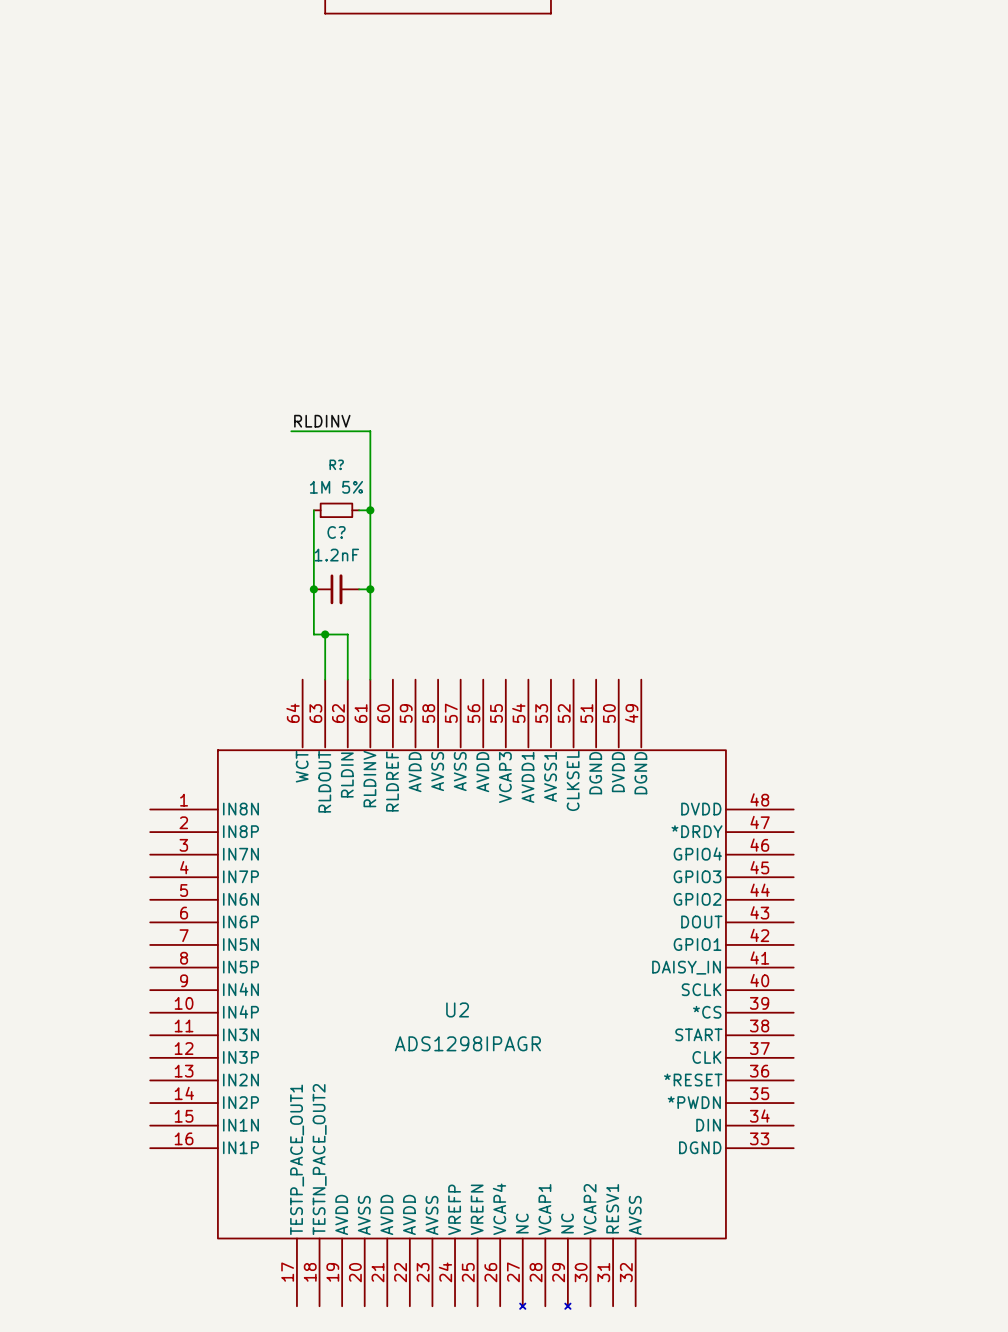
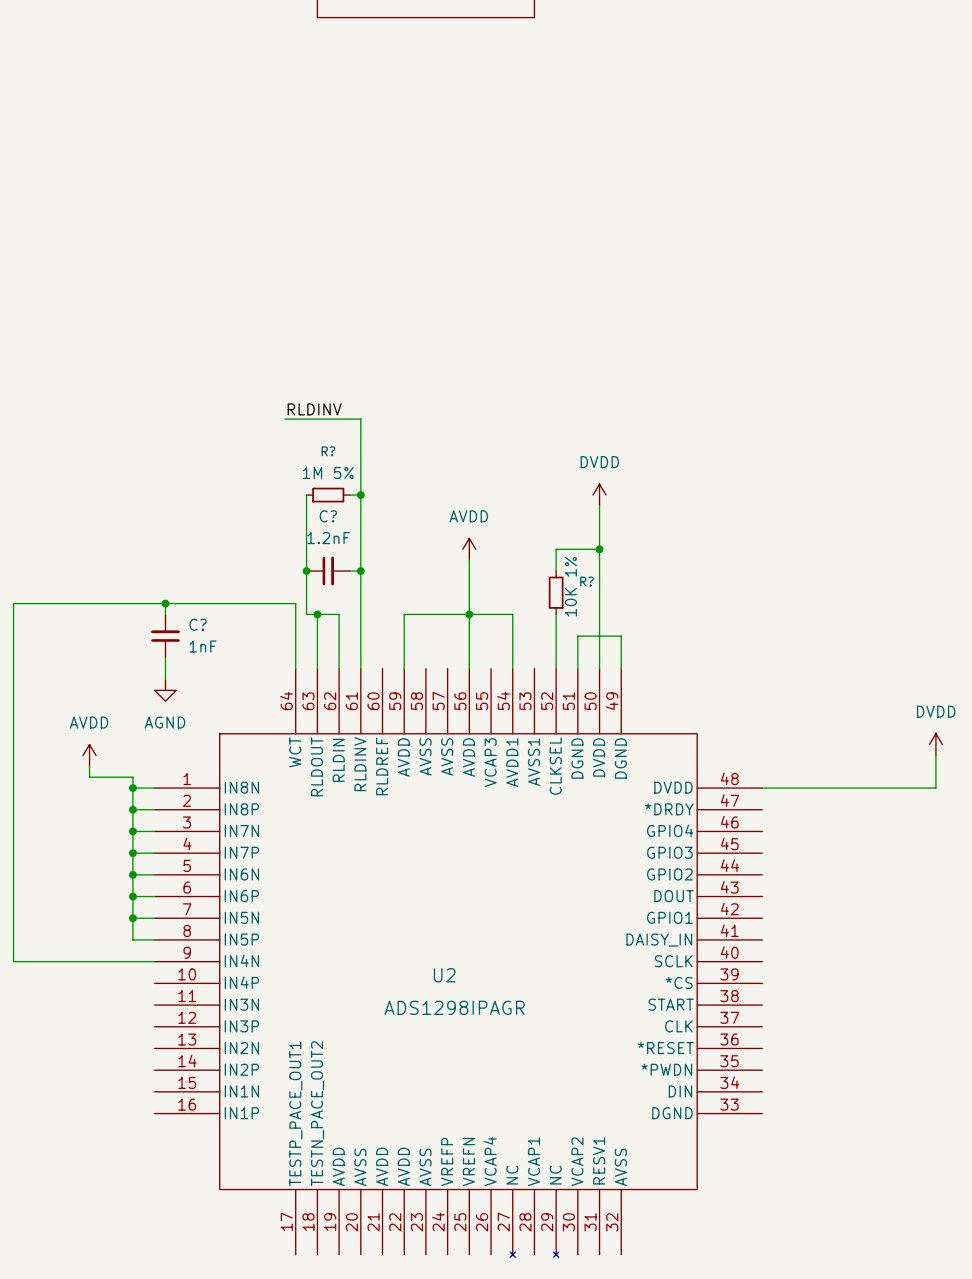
power symbol: none -> DVDD (599, 495)
wire: none -> (599, 505) (599, 668)
power symbol: none -> AVDD (469, 549)
wire: none -> (599, 549) (556, 549) (556, 571)
junction: none -> (599, 549)
wire: none -> (469, 560) (469, 668)
R?: none -> 10K 1% (556, 592)
wire: none -> (165, 603) (165, 614)
junction: none -> (165, 603)
junction: none -> (469, 614)
wire: none -> (556, 614) (556, 668)
C?: none -> 1nF (165, 636)
U2 symbol: [150, 679, 794, 1309] -> [154, 668, 763, 1258]
wire: none -> (165, 657) (165, 679)
wire: none -> (295, 668) (295, 603) (13, 603) (13, 961) (154, 961)
wire: none -> (404, 668) (404, 614) (512, 614) (512, 668)
wire: none -> (577, 668) (577, 636) (621, 636) (621, 668)
power symbol: none -> AGND (165, 690)
power symbol: none -> DVDD (935, 744)
power symbol: none -> AVDD (89, 755)
wire: none -> (935, 755) (935, 788) (762, 788)
wire: none -> (89, 766) (89, 777) (132, 777) (132, 939) (154, 939)
wire: none -> (132, 788) (154, 788)
junction: none -> (132, 788)
wire: none -> (132, 809) (154, 809)
junction: none -> (132, 809)
wire: none -> (132, 831) (154, 831)
junction: none -> (132, 831)
wire: none -> (132, 853) (154, 853)
junction: none -> (132, 853)
wire: none -> (132, 874) (154, 874)
junction: none -> (132, 874)
wire: none -> (132, 896) (154, 896)
junction: none -> (132, 896)
wire: none -> (132, 918) (154, 918)
junction: none -> (132, 918)

